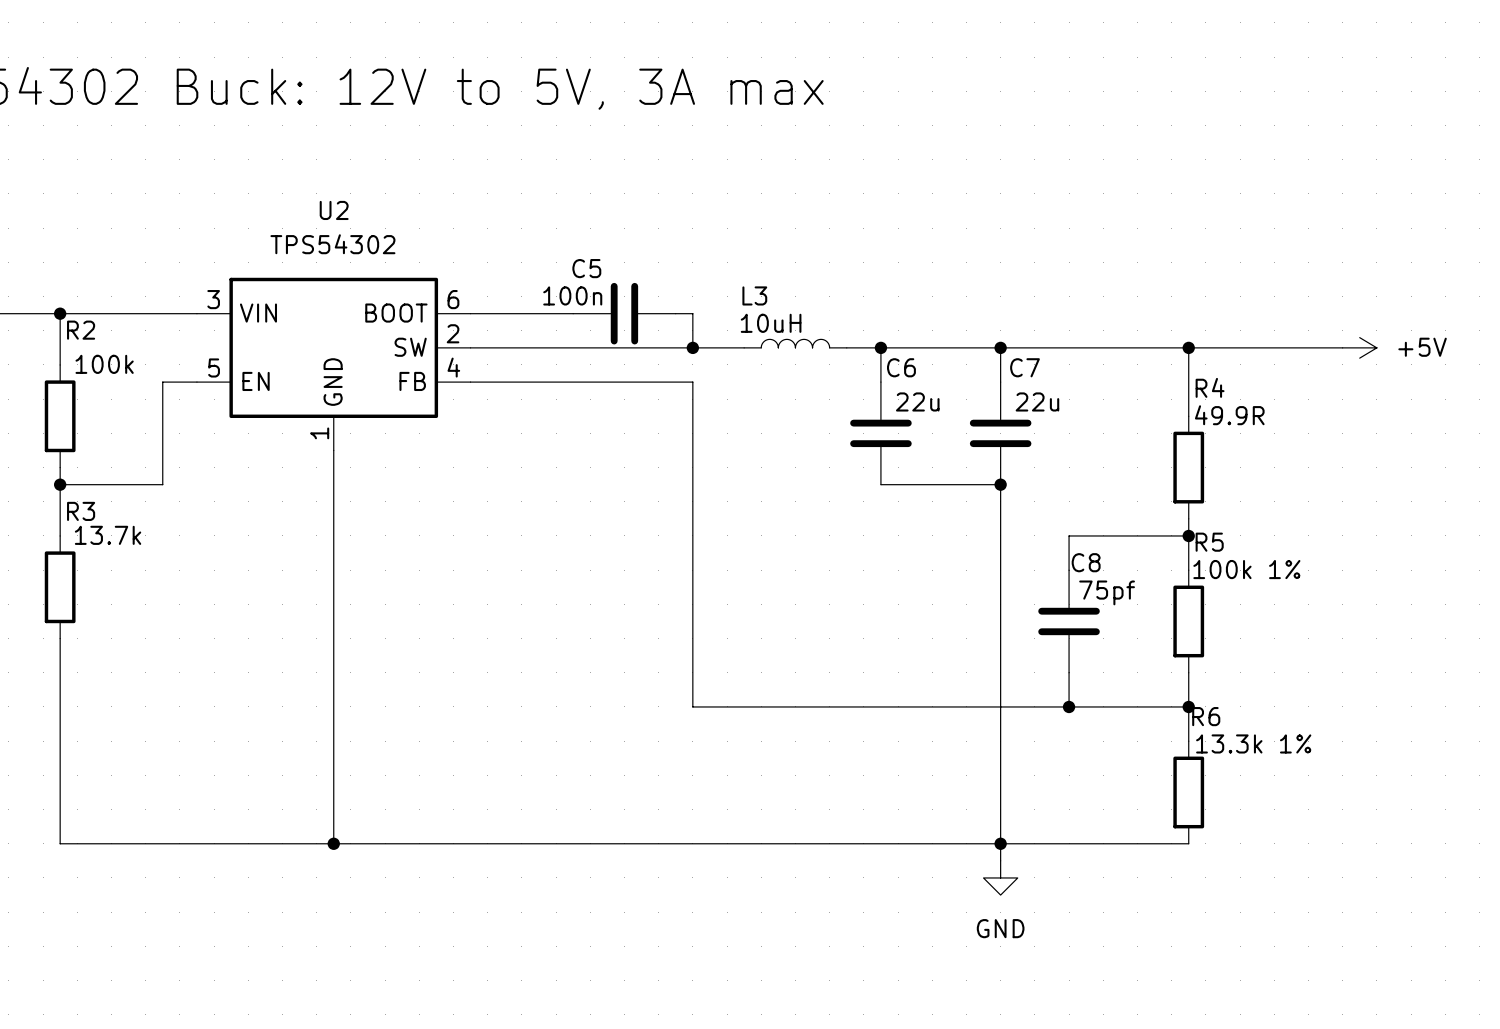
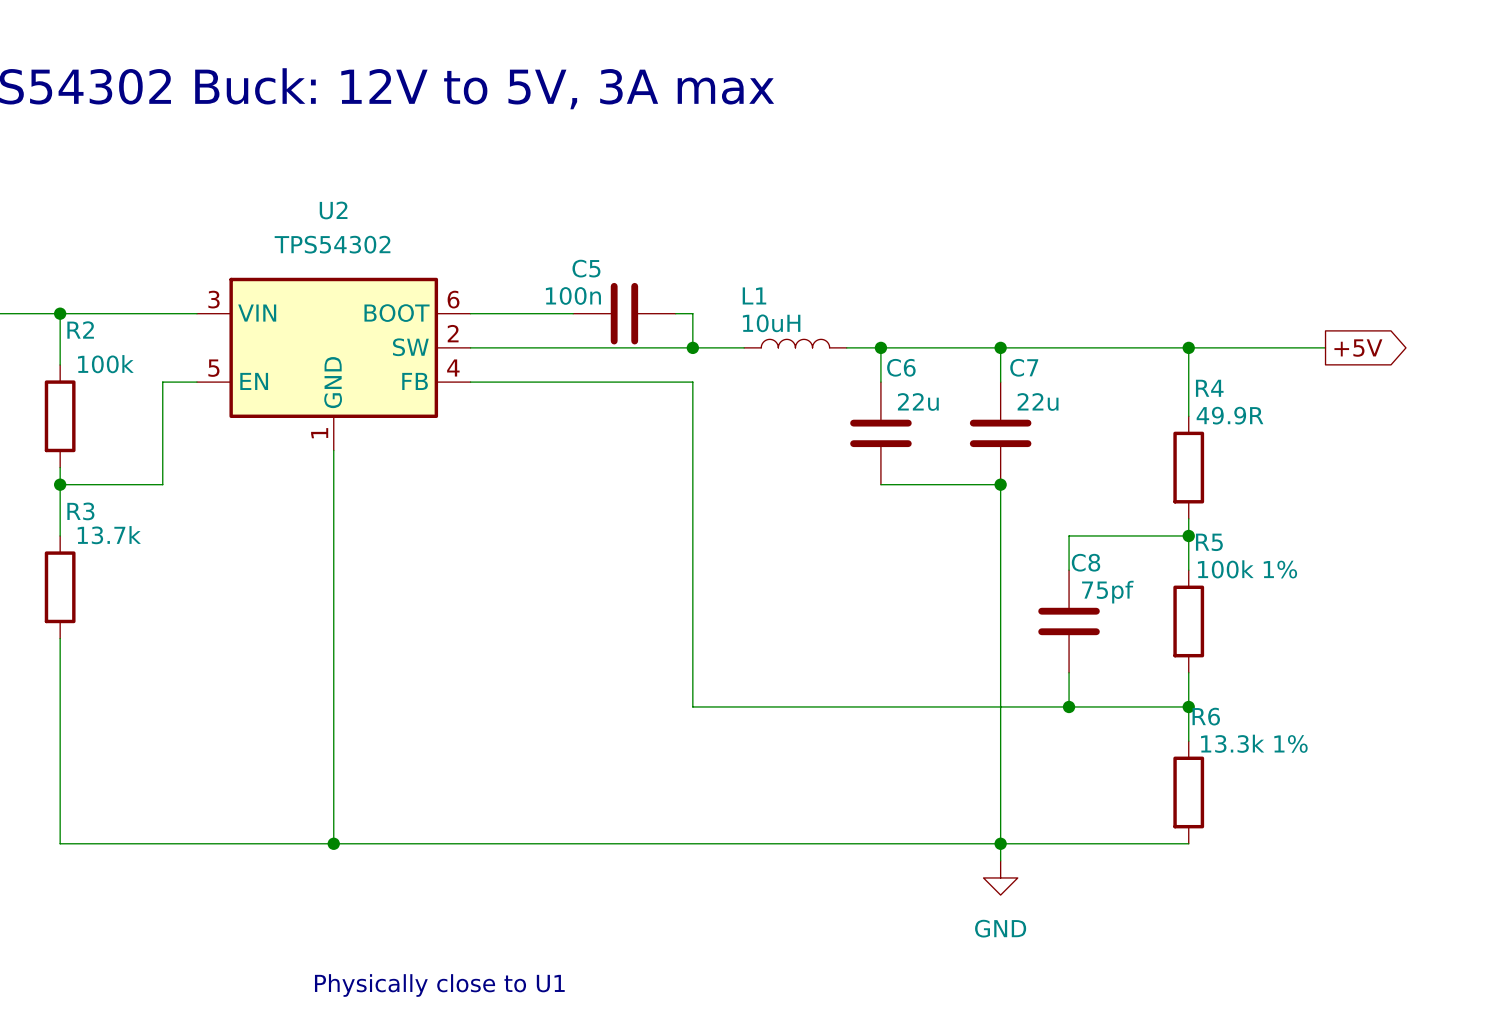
L3 name: L3 (754, 295) -> L1 (754, 295)
wire: (1325, 347) (1342, 347) -> none
power symbol: +5V (1359, 347) -> none
global label: none -> +5V (1358, 348)
text: none -> Physically close to U1 (439, 985)

